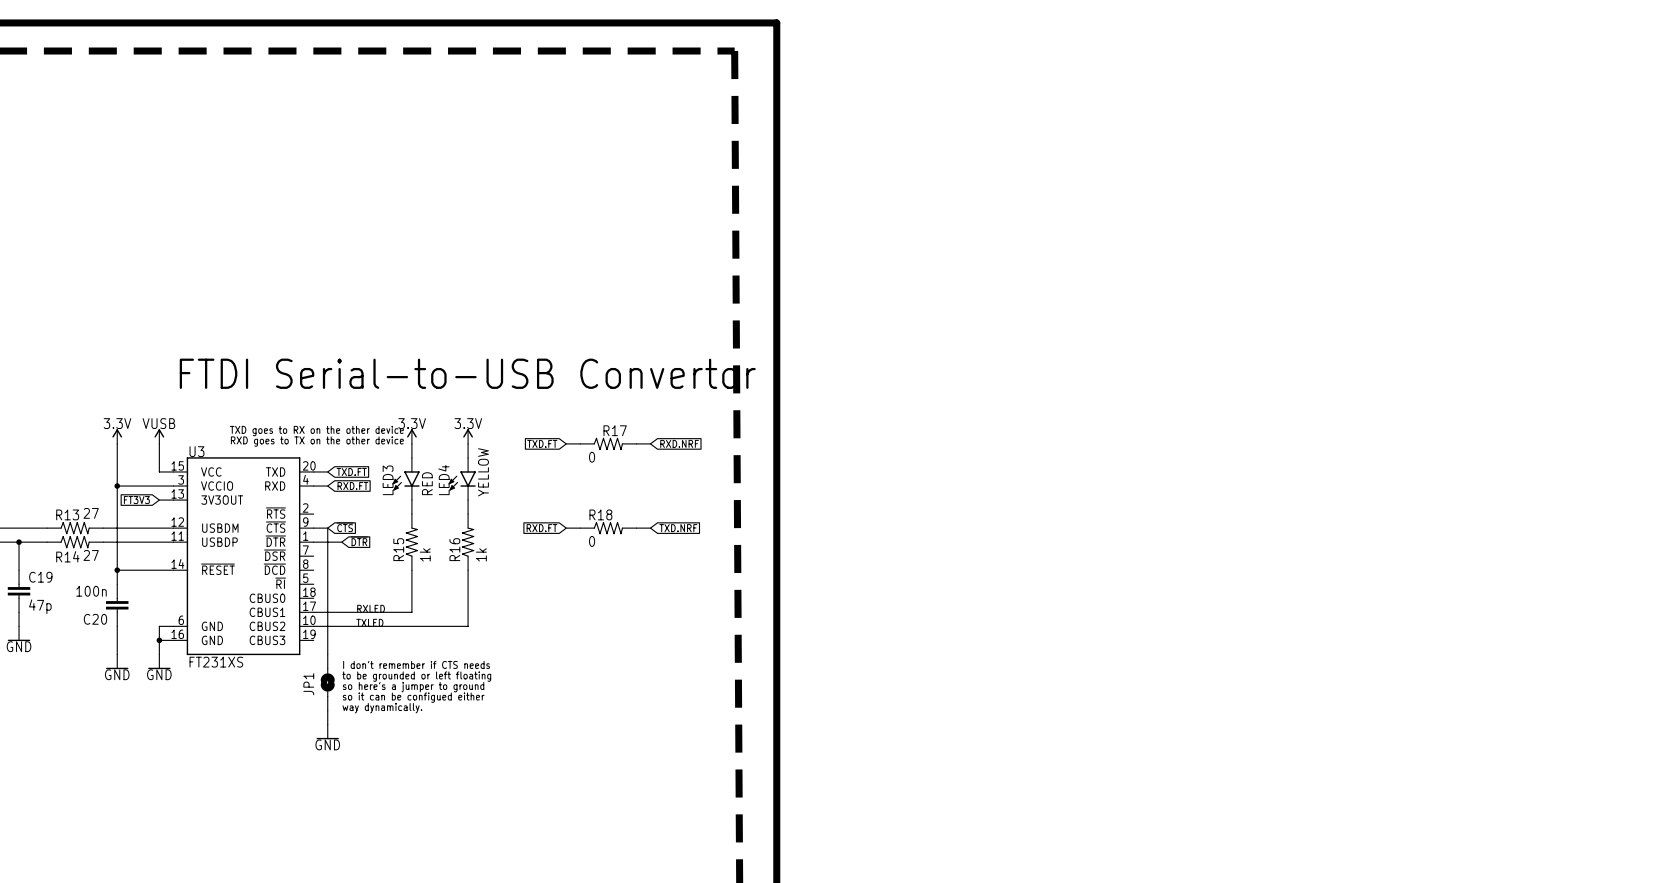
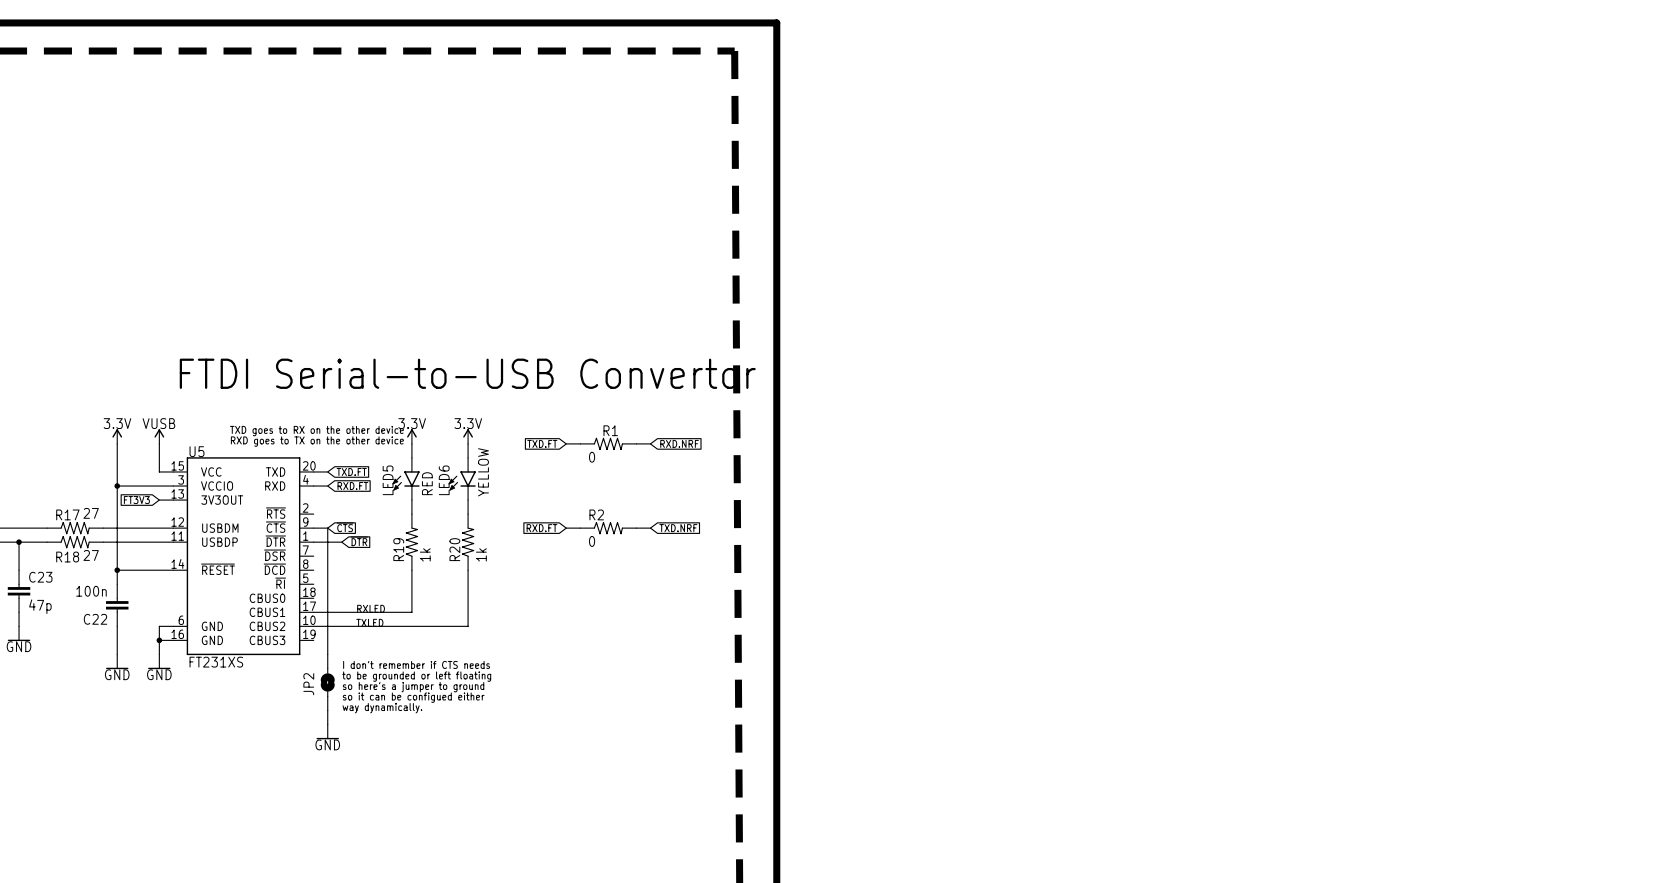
R17 name: R17 (615, 430) -> R1 (610, 430)
U3 name: U3 (196, 451) -> U5 (196, 451)
LED3 name: LED3 (388, 480) -> LED5 (388, 480)
LED4 name: LED4 (443, 480) -> LED6 (444, 480)
R13 name: R13 (67, 514) -> R17 (67, 514)
R18 name: R18 (600, 514) -> R2 (596, 514)
R15 name: R15 (398, 549) -> R19 (398, 549)
R16 name: R16 (454, 549) -> R20 (454, 549)
R14 name: R14 (67, 556) -> R18 (67, 557)
C19 name: C19 (40, 577) -> C23 (40, 577)
C20 name: C20 (95, 619) -> C22 (95, 619)
JP1 name: JP1 (308, 684) -> JP2 (308, 684)

